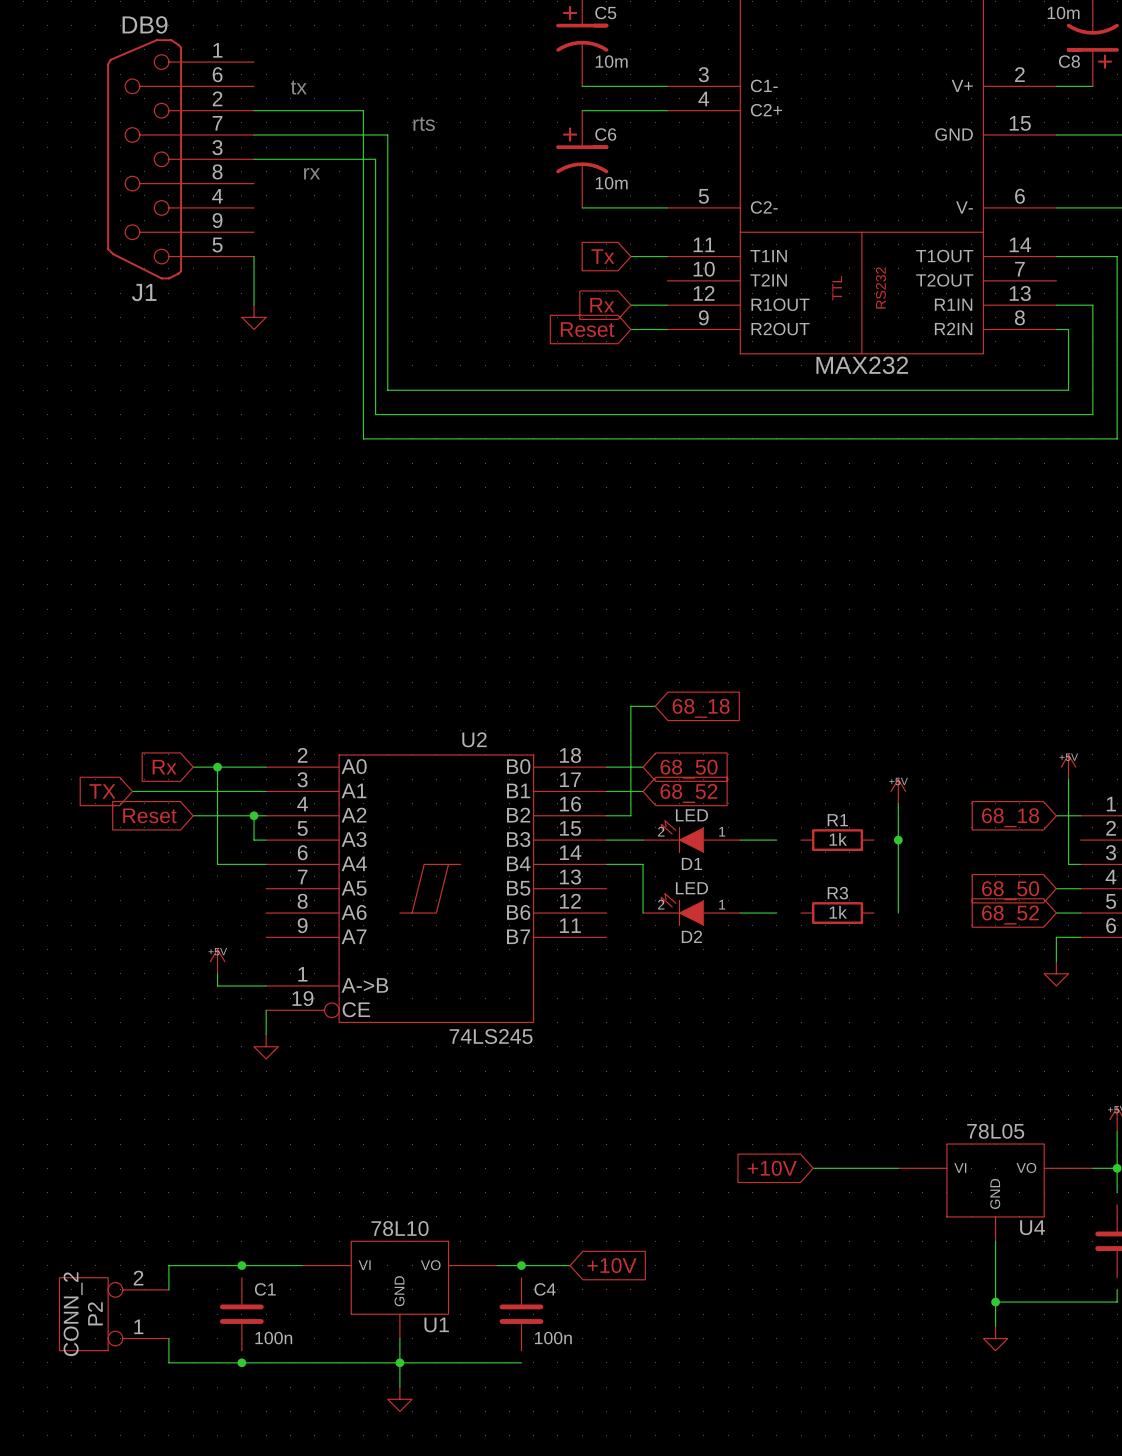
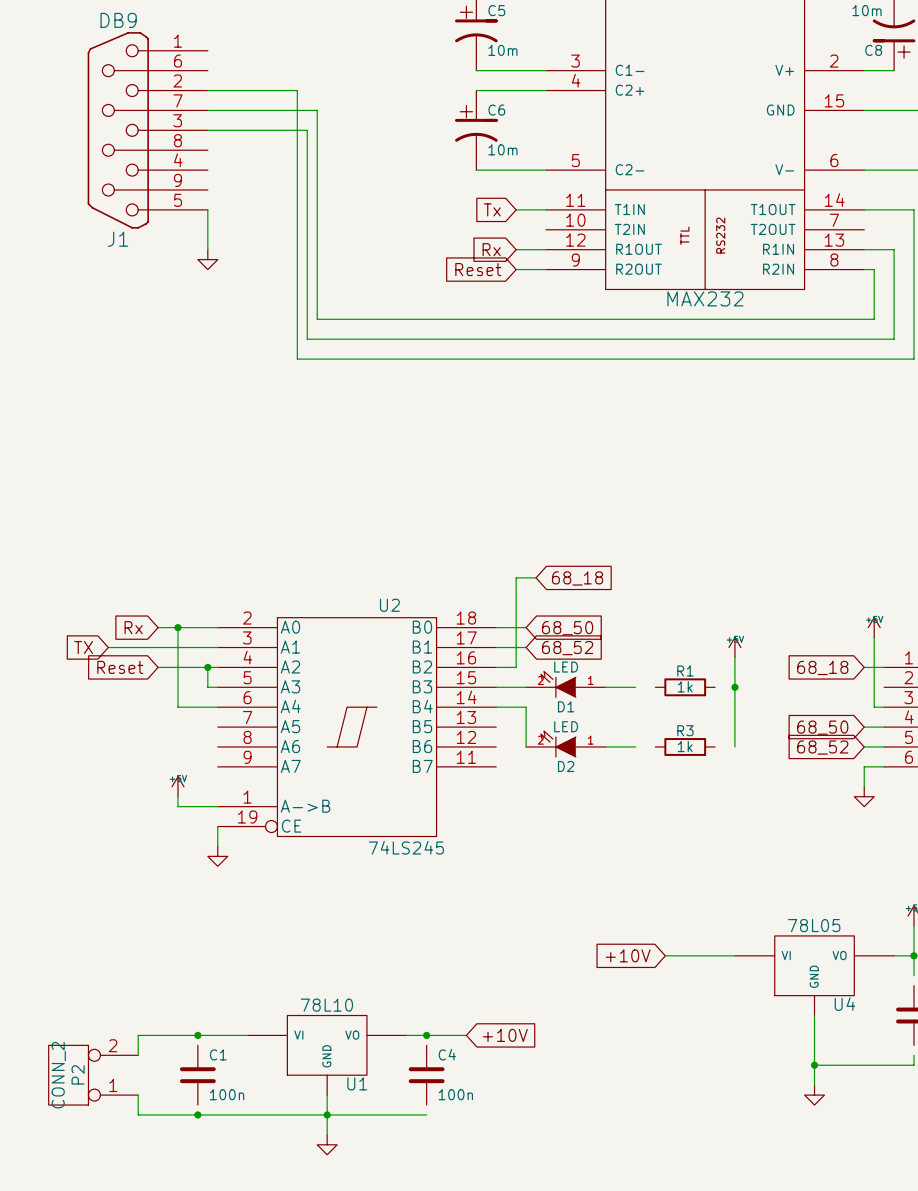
text: tx (298, 87) -> none
text: rts (424, 124) -> none
text: rx (312, 173) -> none

